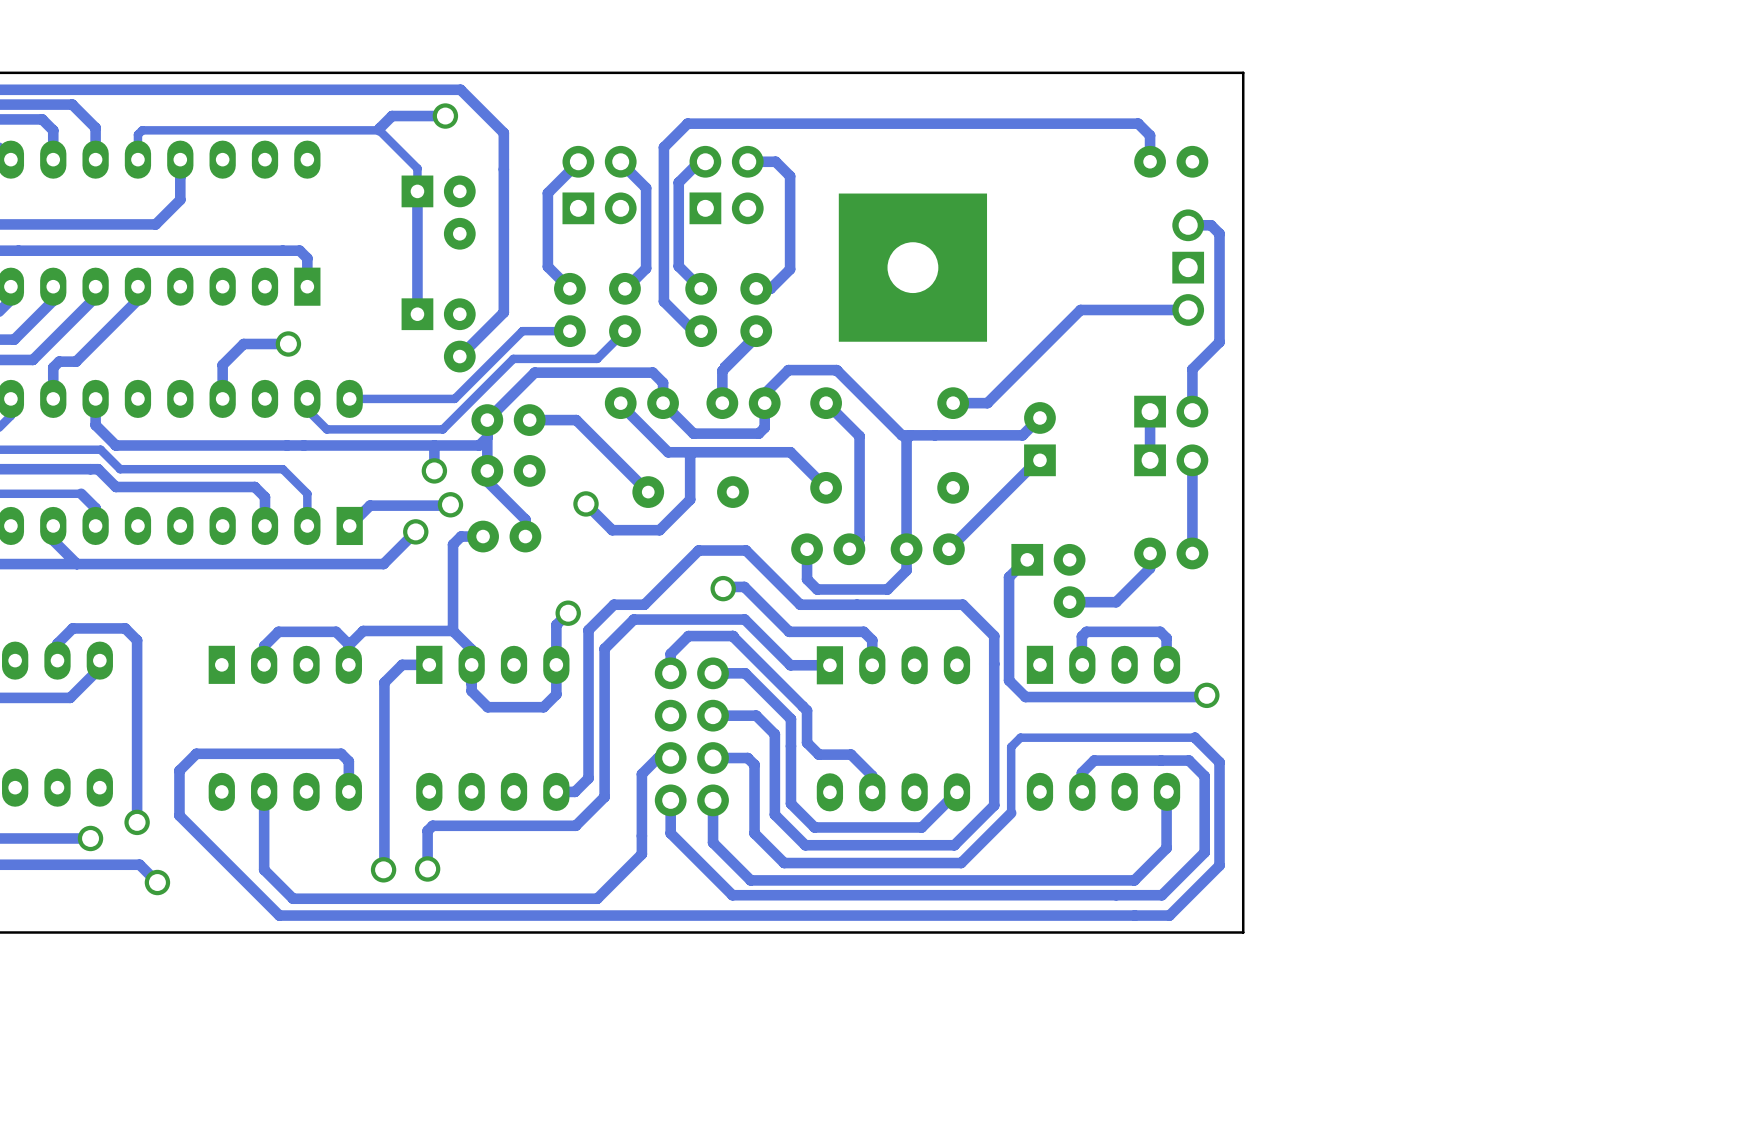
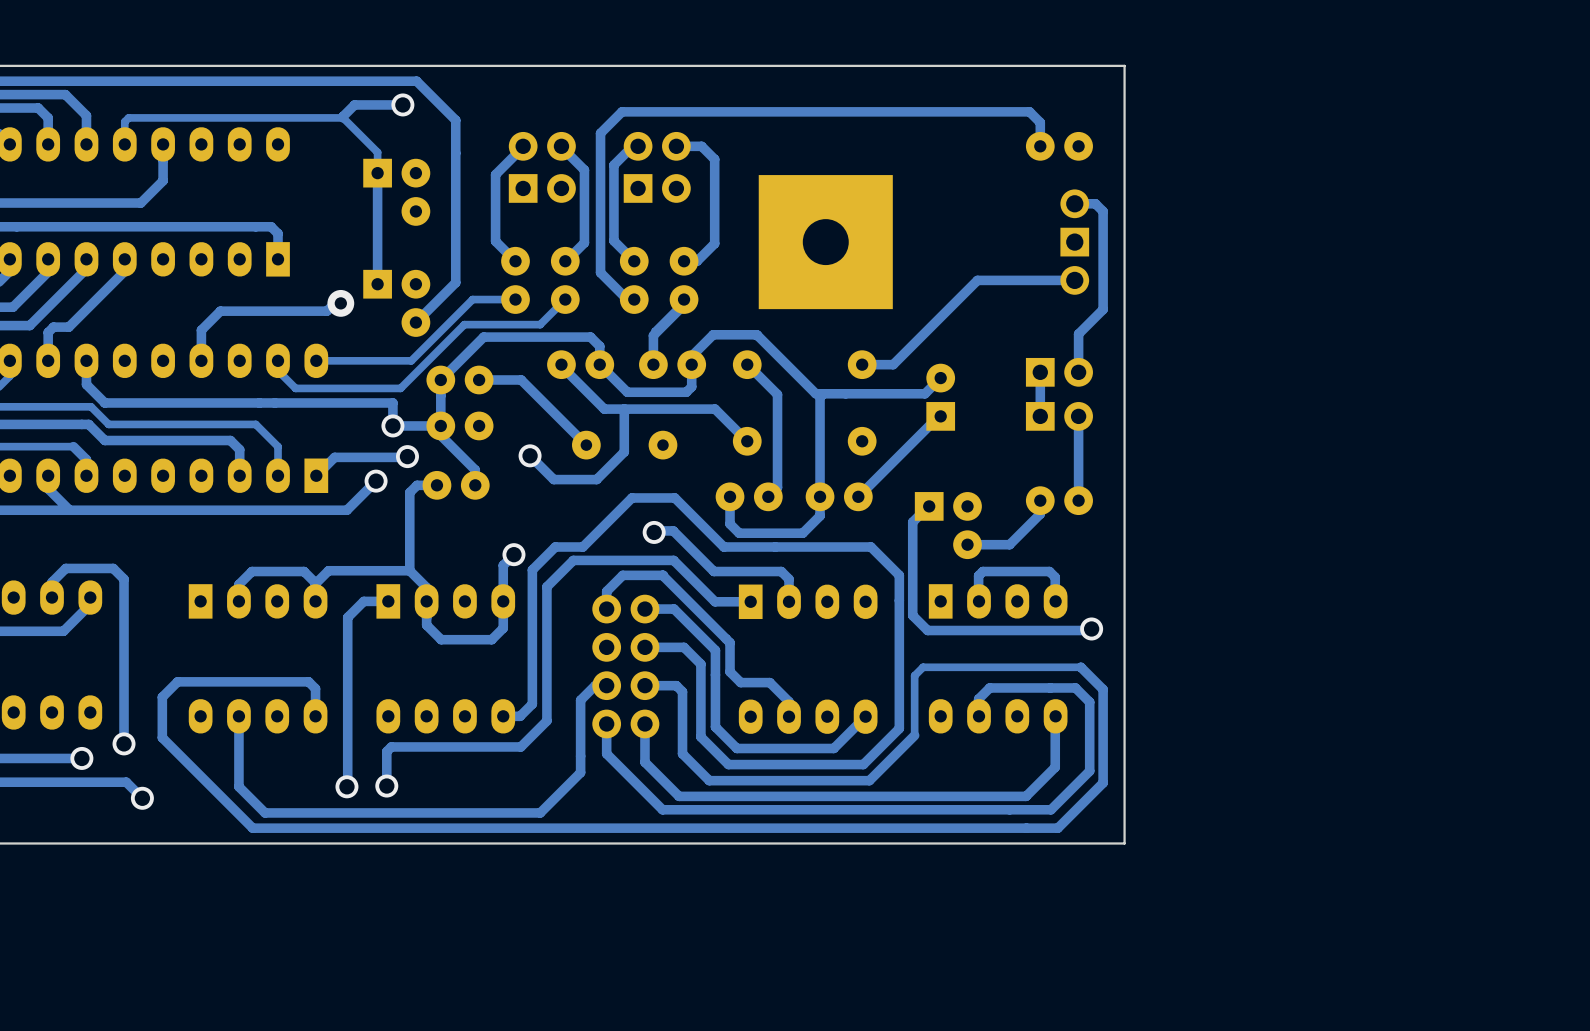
track: none -> (340, 303) (334, 303) (326, 311) (260, 311)
via: none -> (340, 303)
via: (288, 343) -> none
track: (487, 437) (479, 445) (434, 445) -> none
track: none -> (440, 425) (392, 425)

